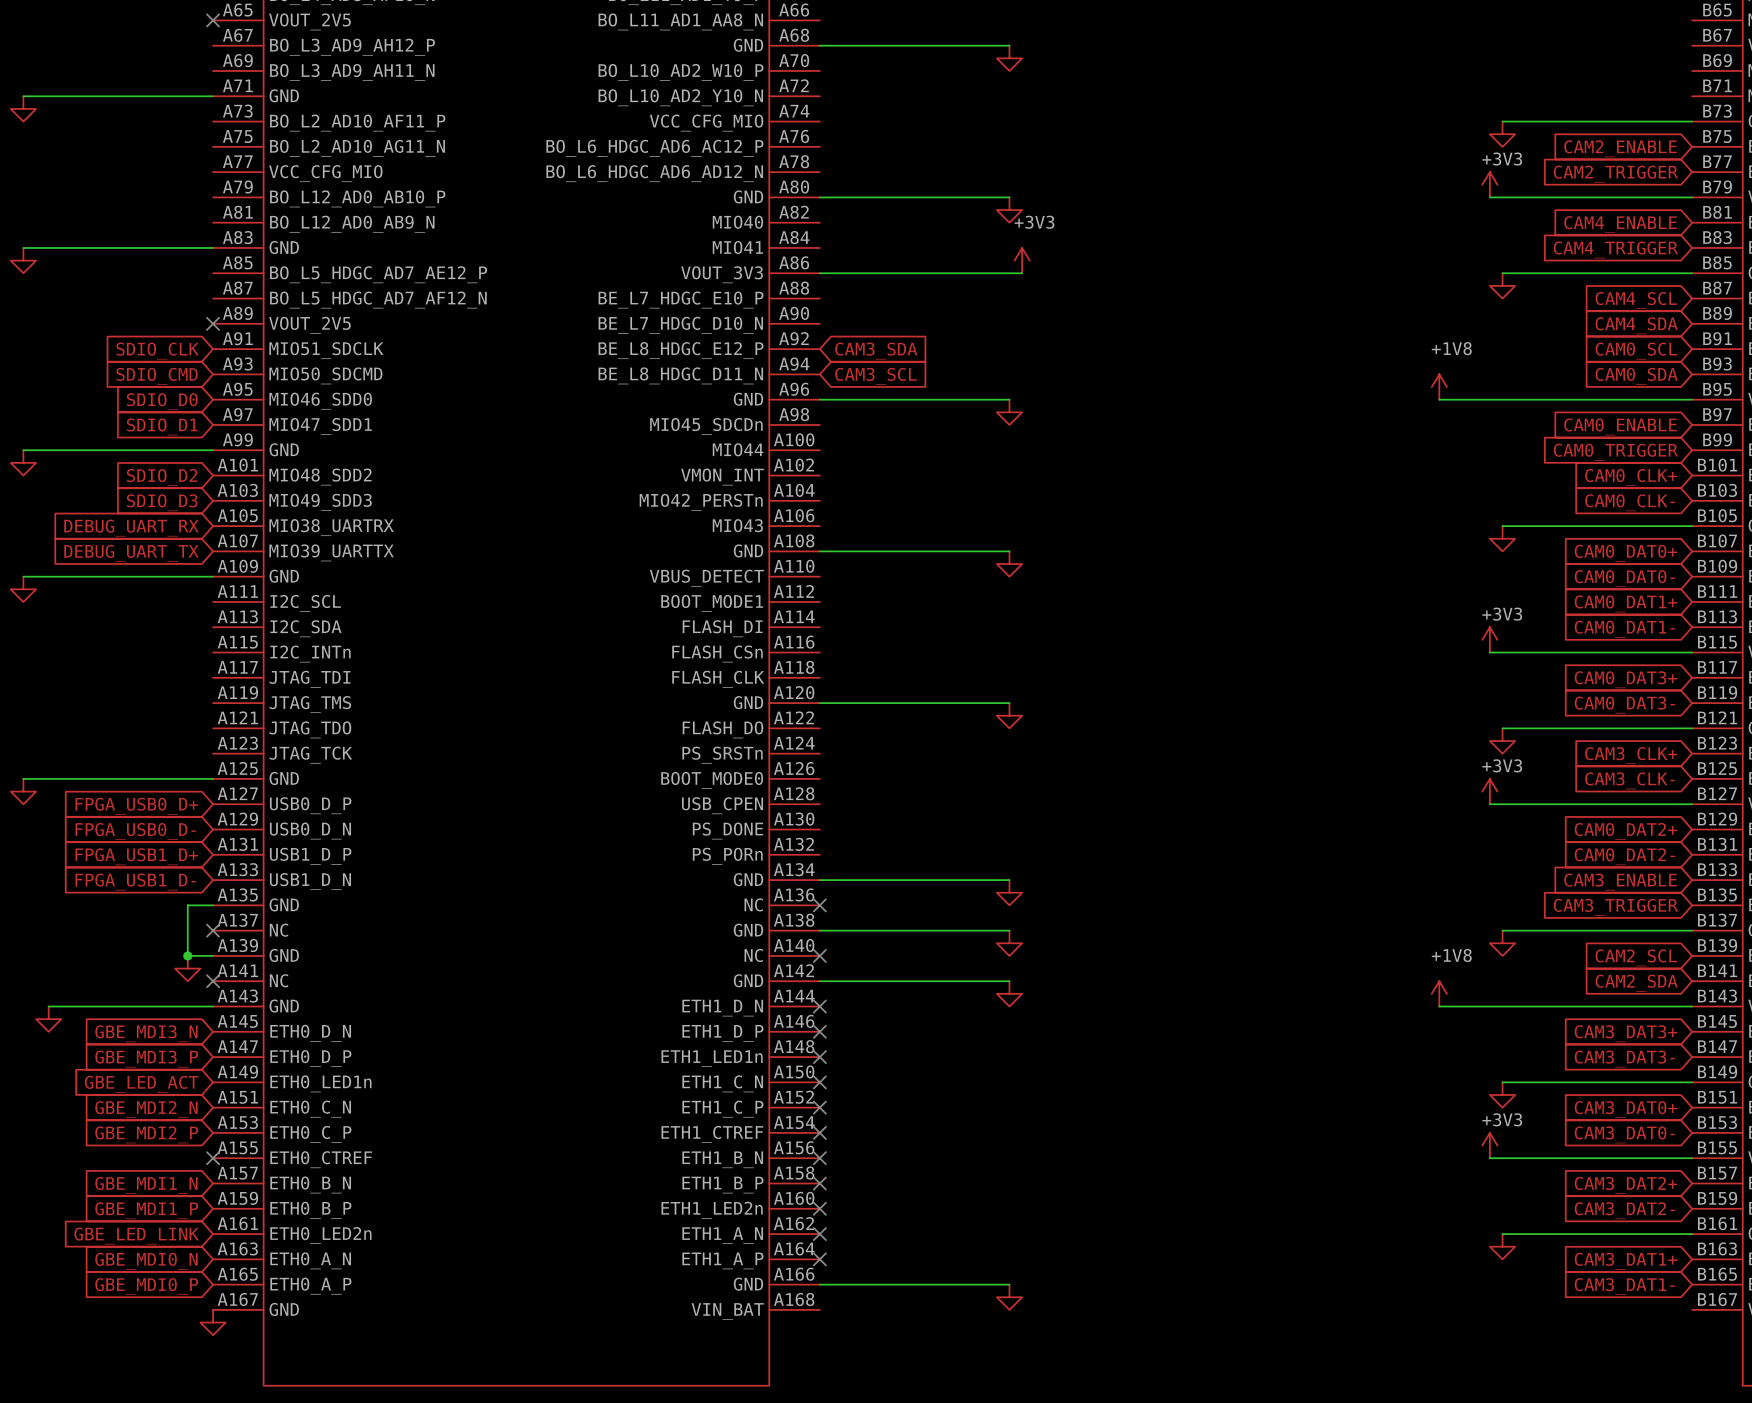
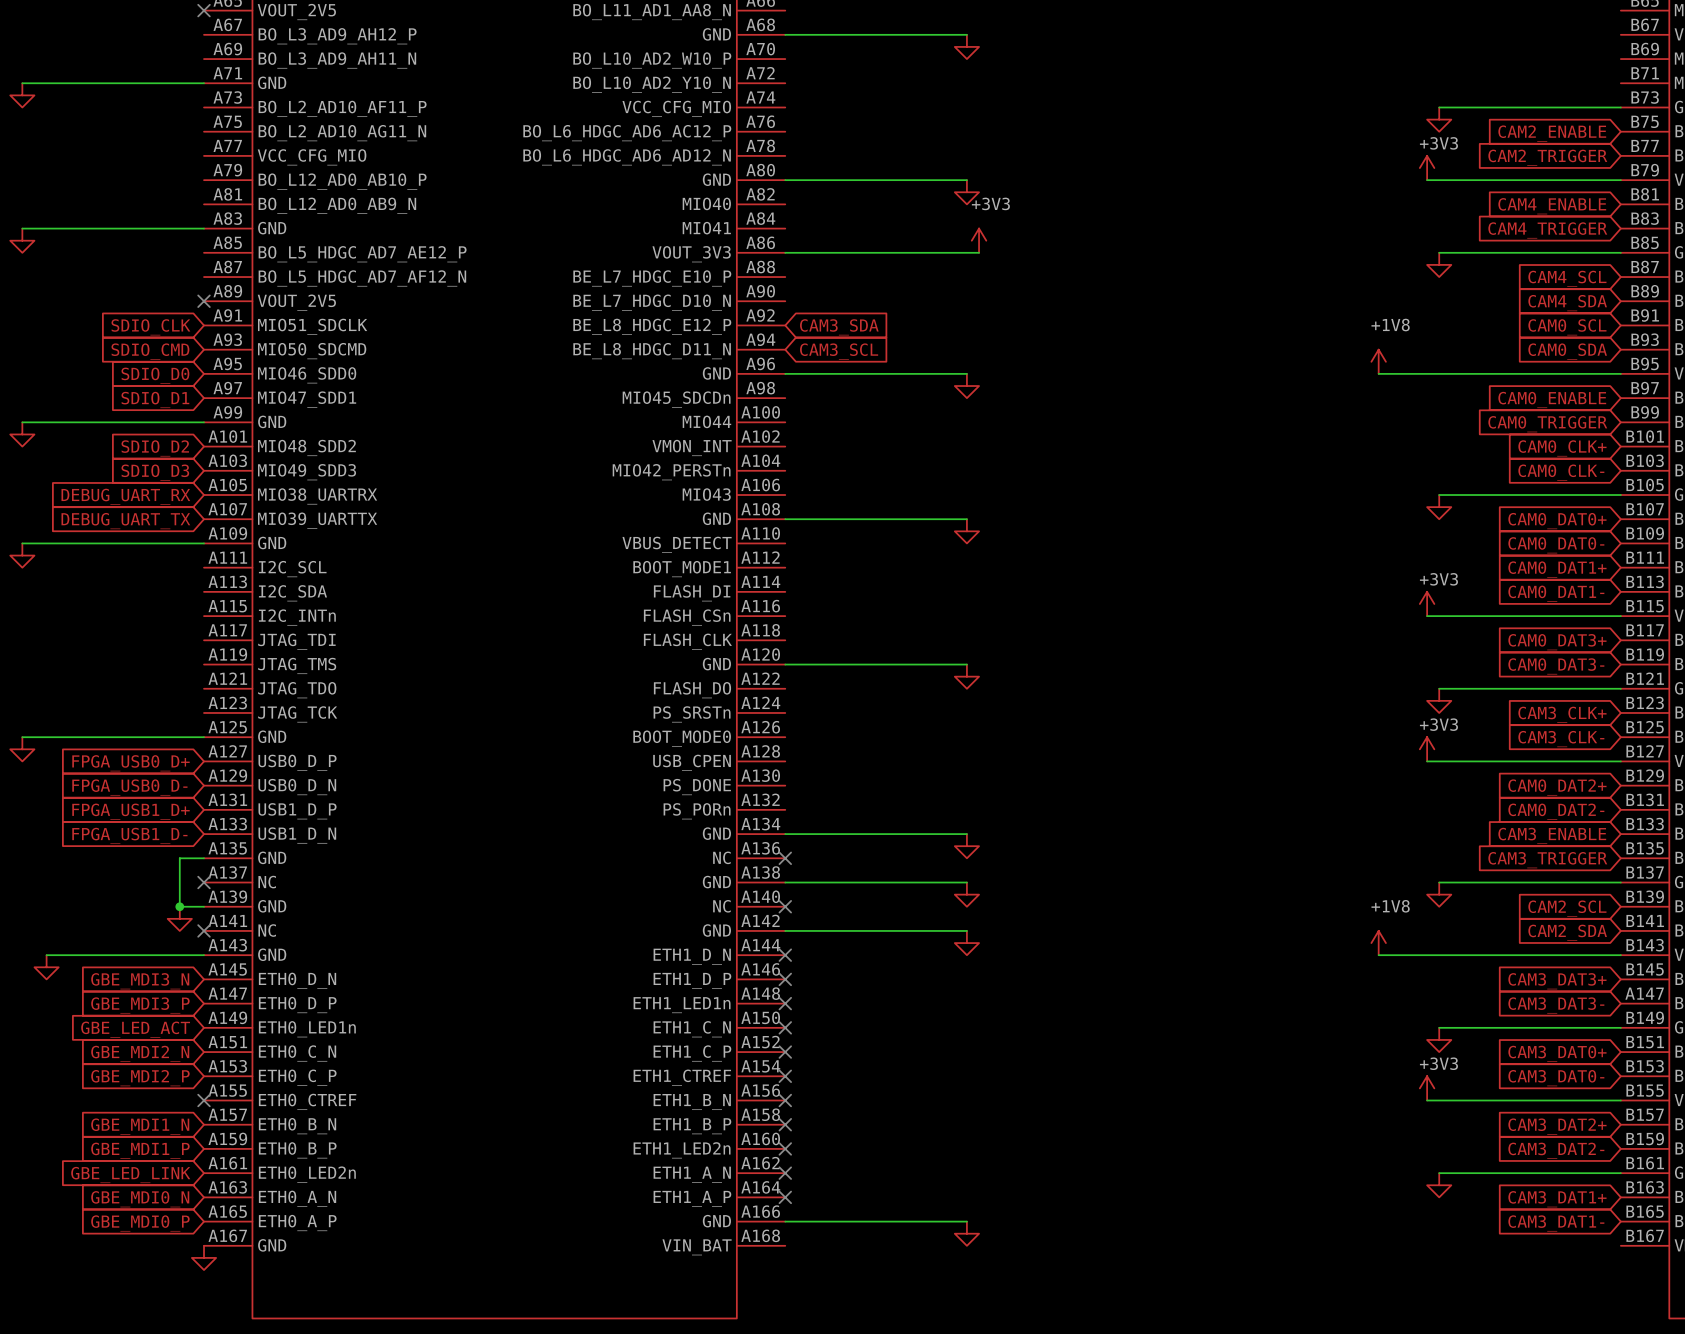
part pin number: B147 (1717, 1046) -> A147 (1644, 993)

